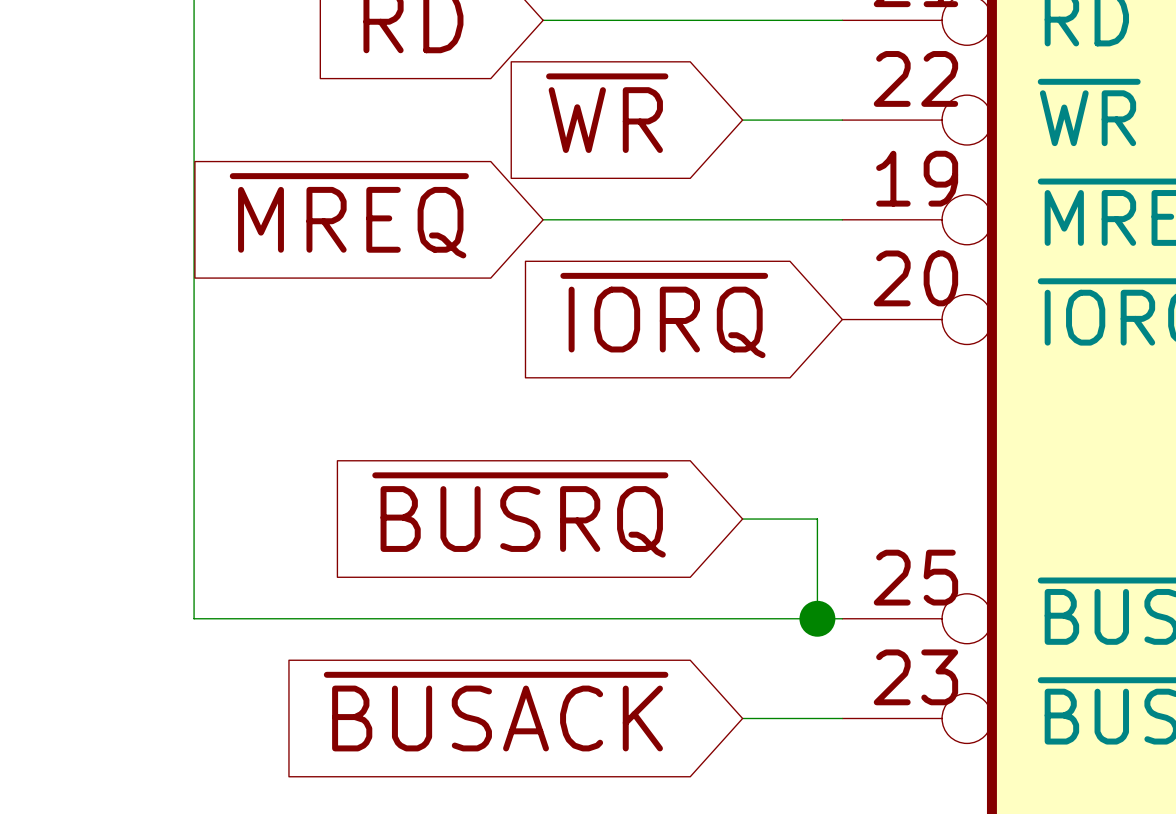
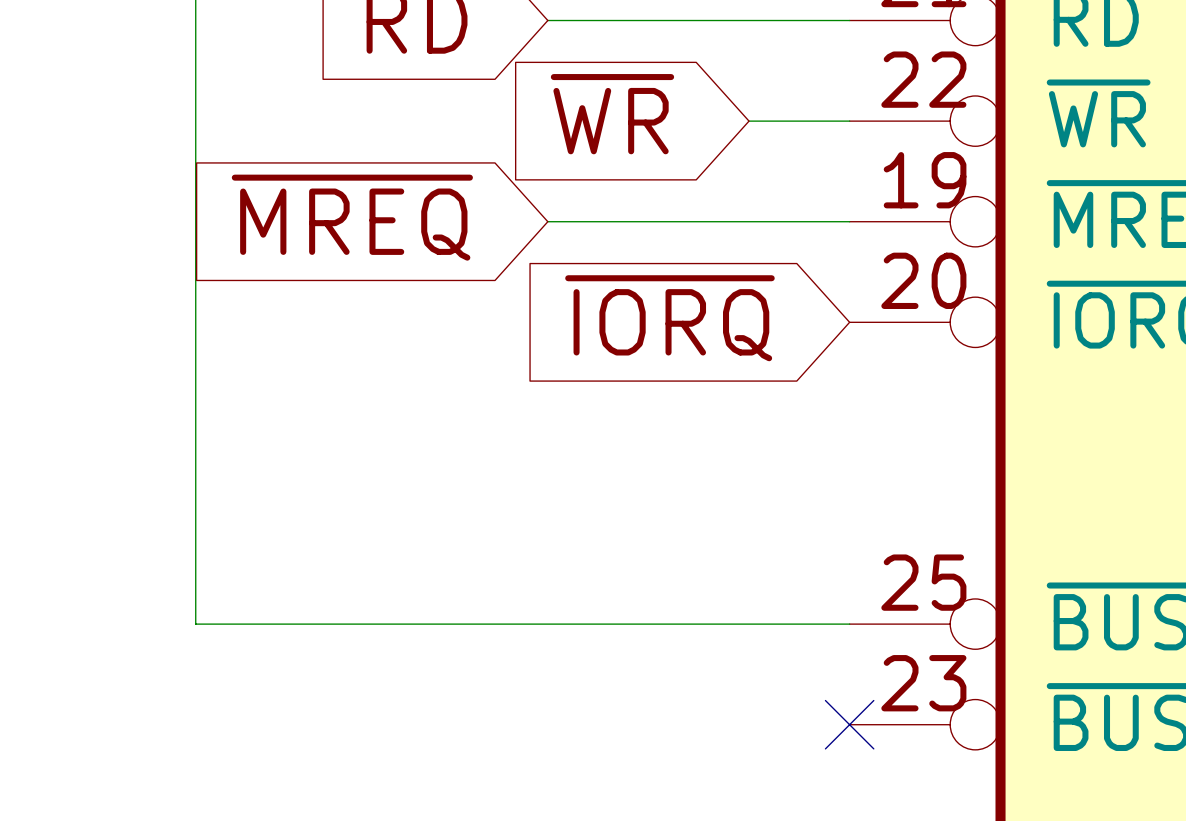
global label: ~{BUSRQ} (520, 514) -> none
wire: (742, 519) (817, 519) (817, 618) -> none
junction: (817, 618) -> none
global label: ~{BUSACK} (496, 711) -> none
wire: (742, 718) (842, 718) -> none
no-connect mark: none -> (849, 724)

